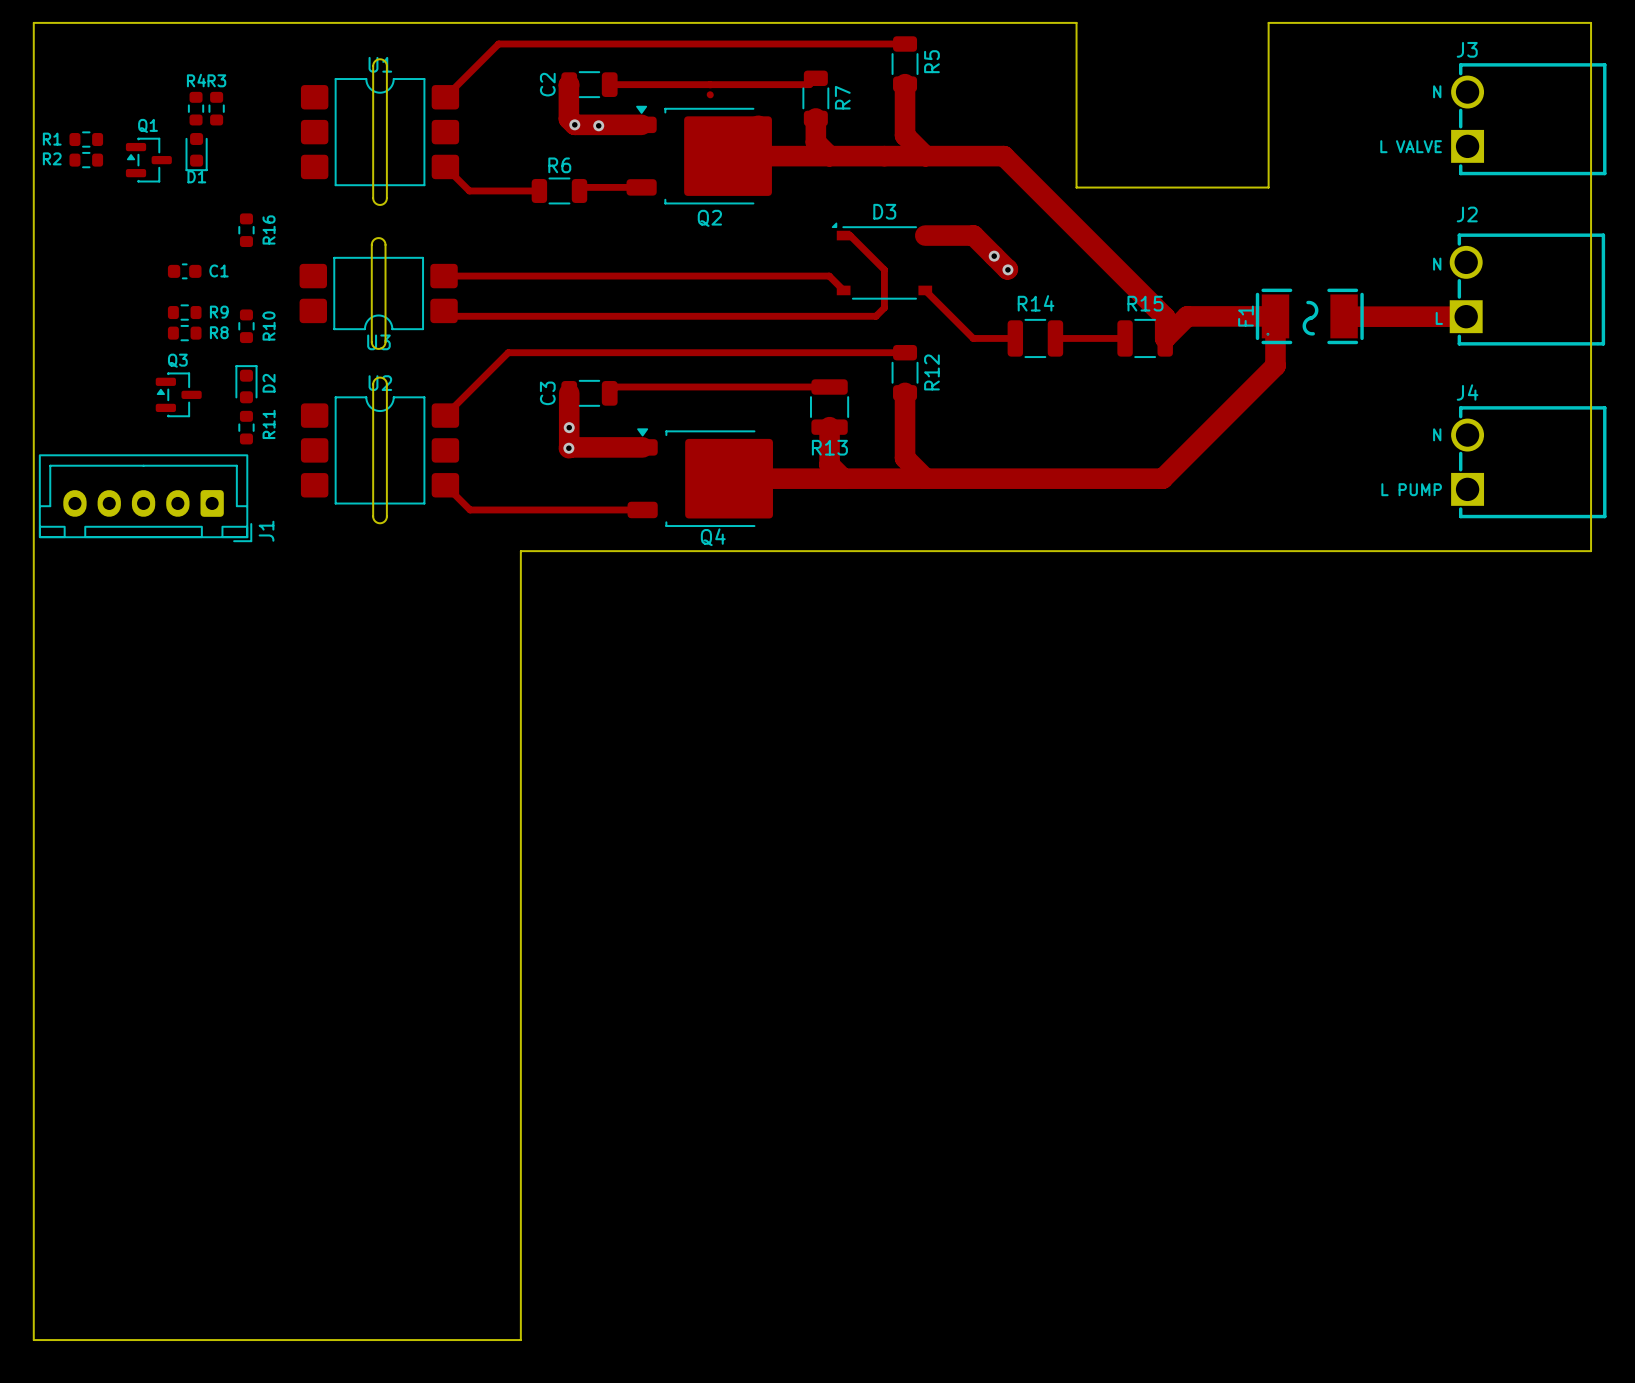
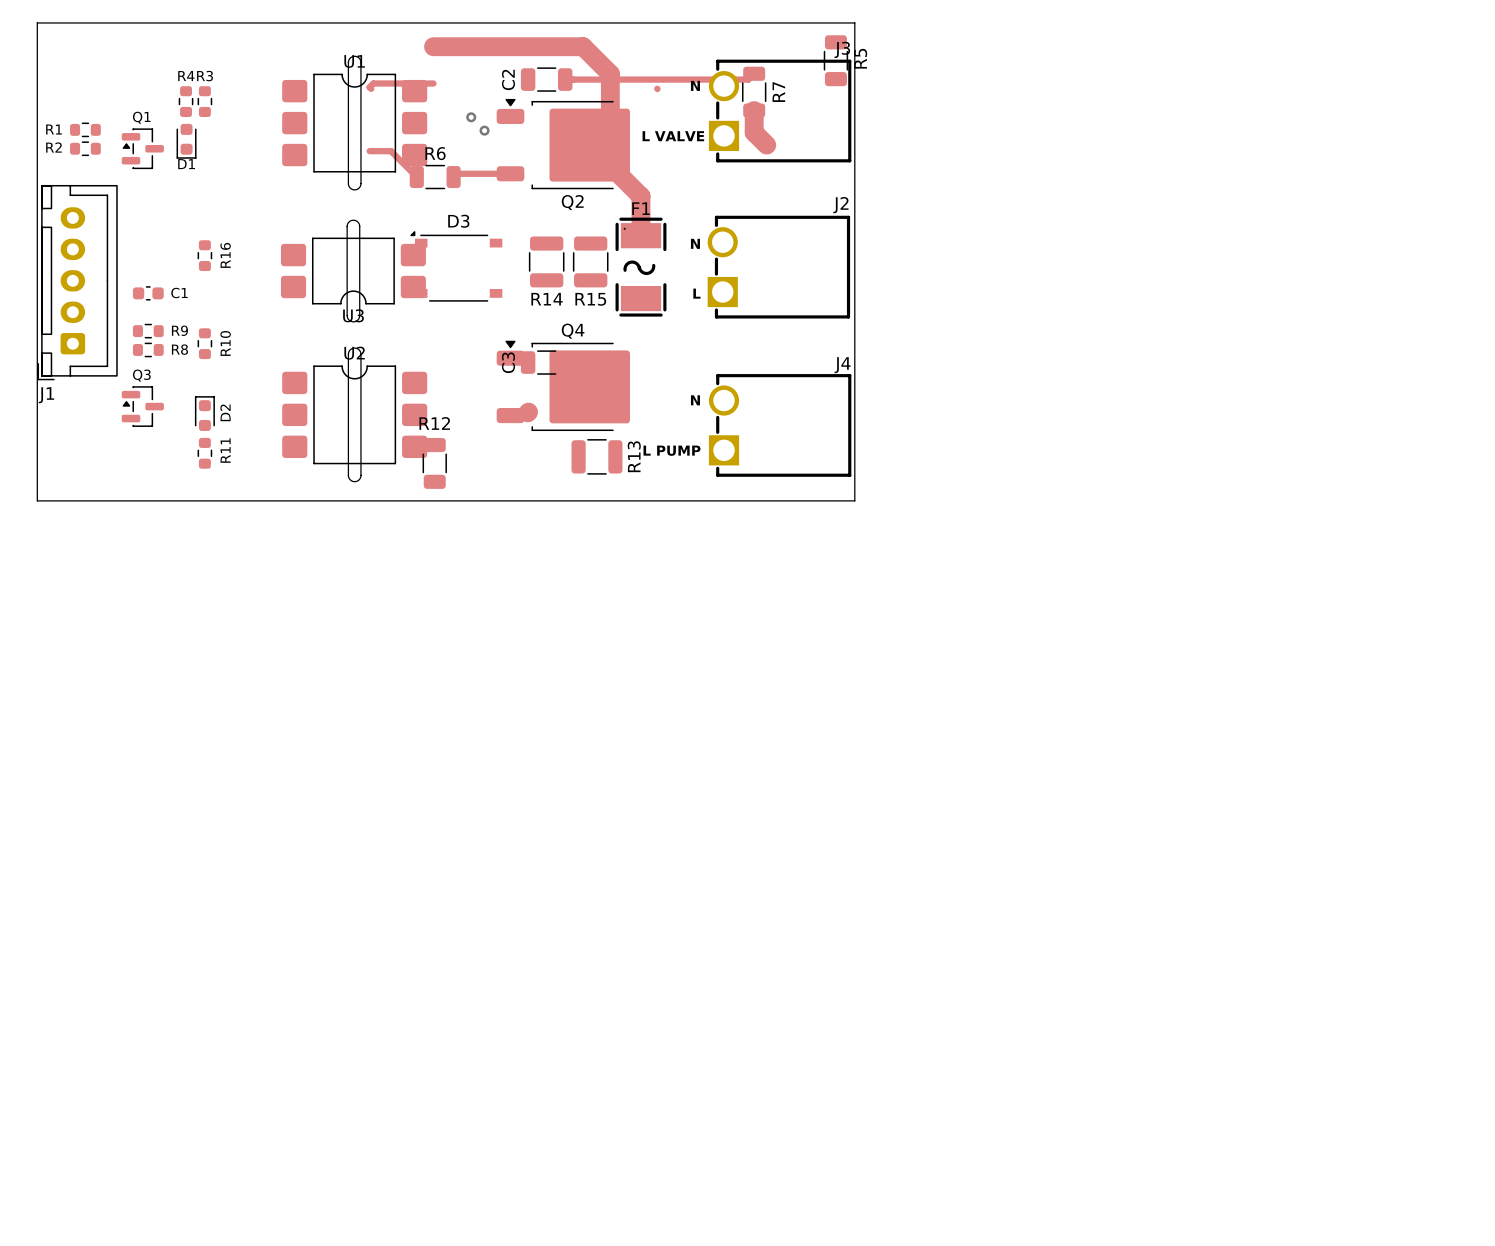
board edge: (925, 22) (1076, 22) (1076, 187) (1268, 187) (1268, 22) (1591, 22) (1591, 551) (520, 551) (520, 1340) (33, 1340) (33, 544) -> (854, 22) (854, 500) (37, 500)
track: (905, 43) (498, 43) (445, 97) (447, 99) -> none
track: none -> (433, 46) (583, 46) (610, 73) (610, 124) (589, 145) (641, 196) (641, 235)
J3 name position: J3 (1467, 49) -> J3 (842, 49)
track: (569, 84) (568, 118) (574, 124) (641, 124) -> none
track: (905, 84) (905, 135) (925, 156) -> none
track: none -> (433, 83) (373, 83) (369, 87) (371, 88)
text: none -> N (695, 85)
text: N (1437, 91) -> none
J3 position: (1528, 119) -> (780, 111)
via: (574, 124) -> none
via: none -> (471, 117)
via: (598, 125) -> none
track: (758, 125) (728, 156) (1003, 156) (1165, 317) (1165, 338) (1187, 316) (1275, 316) (1275, 365) (1162, 478) (729, 478) -> none
via: none -> (484, 130)
text: none -> L VALVE (673, 136)
text: L VALVE (1411, 146) -> none
Q2 position: (699, 155) -> (563, 144)
track: none -> (369, 151) (390, 151) (416, 177)
track: (445, 166) (469, 190) (539, 190) -> none
track: (641, 187) (583, 187) (579, 190) -> (510, 173) (456, 173) (453, 177)
R6 position: (559, 190) -> (435, 177)
J2 name position: J2 (1467, 214) -> J2 (840, 205)
R16 position: (246, 230) -> (204, 255)
track: (843, 235) (850, 235) (884, 269) (884, 307) (876, 316) (449, 316) -> none
track: (925, 235) (973, 235) (1007, 269) -> none
via: (994, 256) -> none
D3 position: (881, 261) -> (456, 266)
text: none -> N (695, 243)
text: N (1437, 264) -> none
via: (1007, 269) -> none
C1 position: (184, 271) -> (148, 293)
track: (444, 276) (829, 276) (843, 290) -> none
J2 position: (1527, 289) -> (778, 267)
track: (925, 290) (973, 338) (1015, 338) -> none
R14 name position: R14 (1036, 303) -> R14 (547, 299)
R15 name position: R15 (1145, 303) -> R15 (590, 299)
R9 position: (184, 312) -> (148, 331)
F1 rotation: 0° (1309, 316) -> 90° clockwise (641, 267)
F1 position: (1309, 316) -> (641, 267)
track: (1344, 316) (1466, 316) -> none
text: none -> L (696, 293)
text: L (1439, 318) -> none
R10 position: (246, 326) -> (204, 343)
R8 position: (184, 333) -> (148, 349)
R14 rotation: 0° (1035, 338) -> 90° clockwise (546, 261)
R14 position: (1035, 338) -> (546, 261)
track: (1055, 338) (1125, 338) -> none
R15 rotation: 0° (1145, 338) -> 90° clockwise (590, 261)
R15 position: (1145, 338) -> (590, 261)
track: (905, 352) (508, 352) (445, 415) -> none
R12 position: (905, 372) -> (434, 463)
R12 name rotation: 0° (931, 372) -> 90° clockwise (434, 423)
R12 name position: R12 (931, 372) -> R12 (434, 423)
D2 position: (246, 384) -> (204, 413)
track: (829, 387) (616, 387) (609, 393) -> none
track: (905, 392) (905, 458) (925, 478) -> none
J4 name position: J4 (1467, 392) -> J4 (842, 365)
track: (569, 393) (569, 447) (642, 447) -> none
Q3 position: (178, 394) -> (142, 406)
R13 rotation: 0° (829, 407) -> 90° clockwise (596, 456)
R13 position: (829, 407) -> (596, 456)
R11 position: (246, 427) -> (204, 453)
via: (569, 427) -> none
track: (829, 427) (829, 464) (843, 478) -> none
text: none -> N (695, 400)
text: N (1437, 434) -> none
R13 name position: R13 (829, 447) -> R13 (634, 456)
via: (568, 448) -> none
J4 position: (1528, 462) -> (780, 425)
Q4 position: (700, 477) -> (563, 385)
track: (445, 485) (470, 509) (642, 509) -> none
text: none -> L PUMP (671, 450)
text: L PUMP (1411, 489) -> none
J1 rotation: 0° (145, 498) -> 90° clockwise (77, 282)
J1 position: (145, 498) -> (77, 282)
Q4 name position: Q4 (713, 537) -> Q4 (573, 331)

